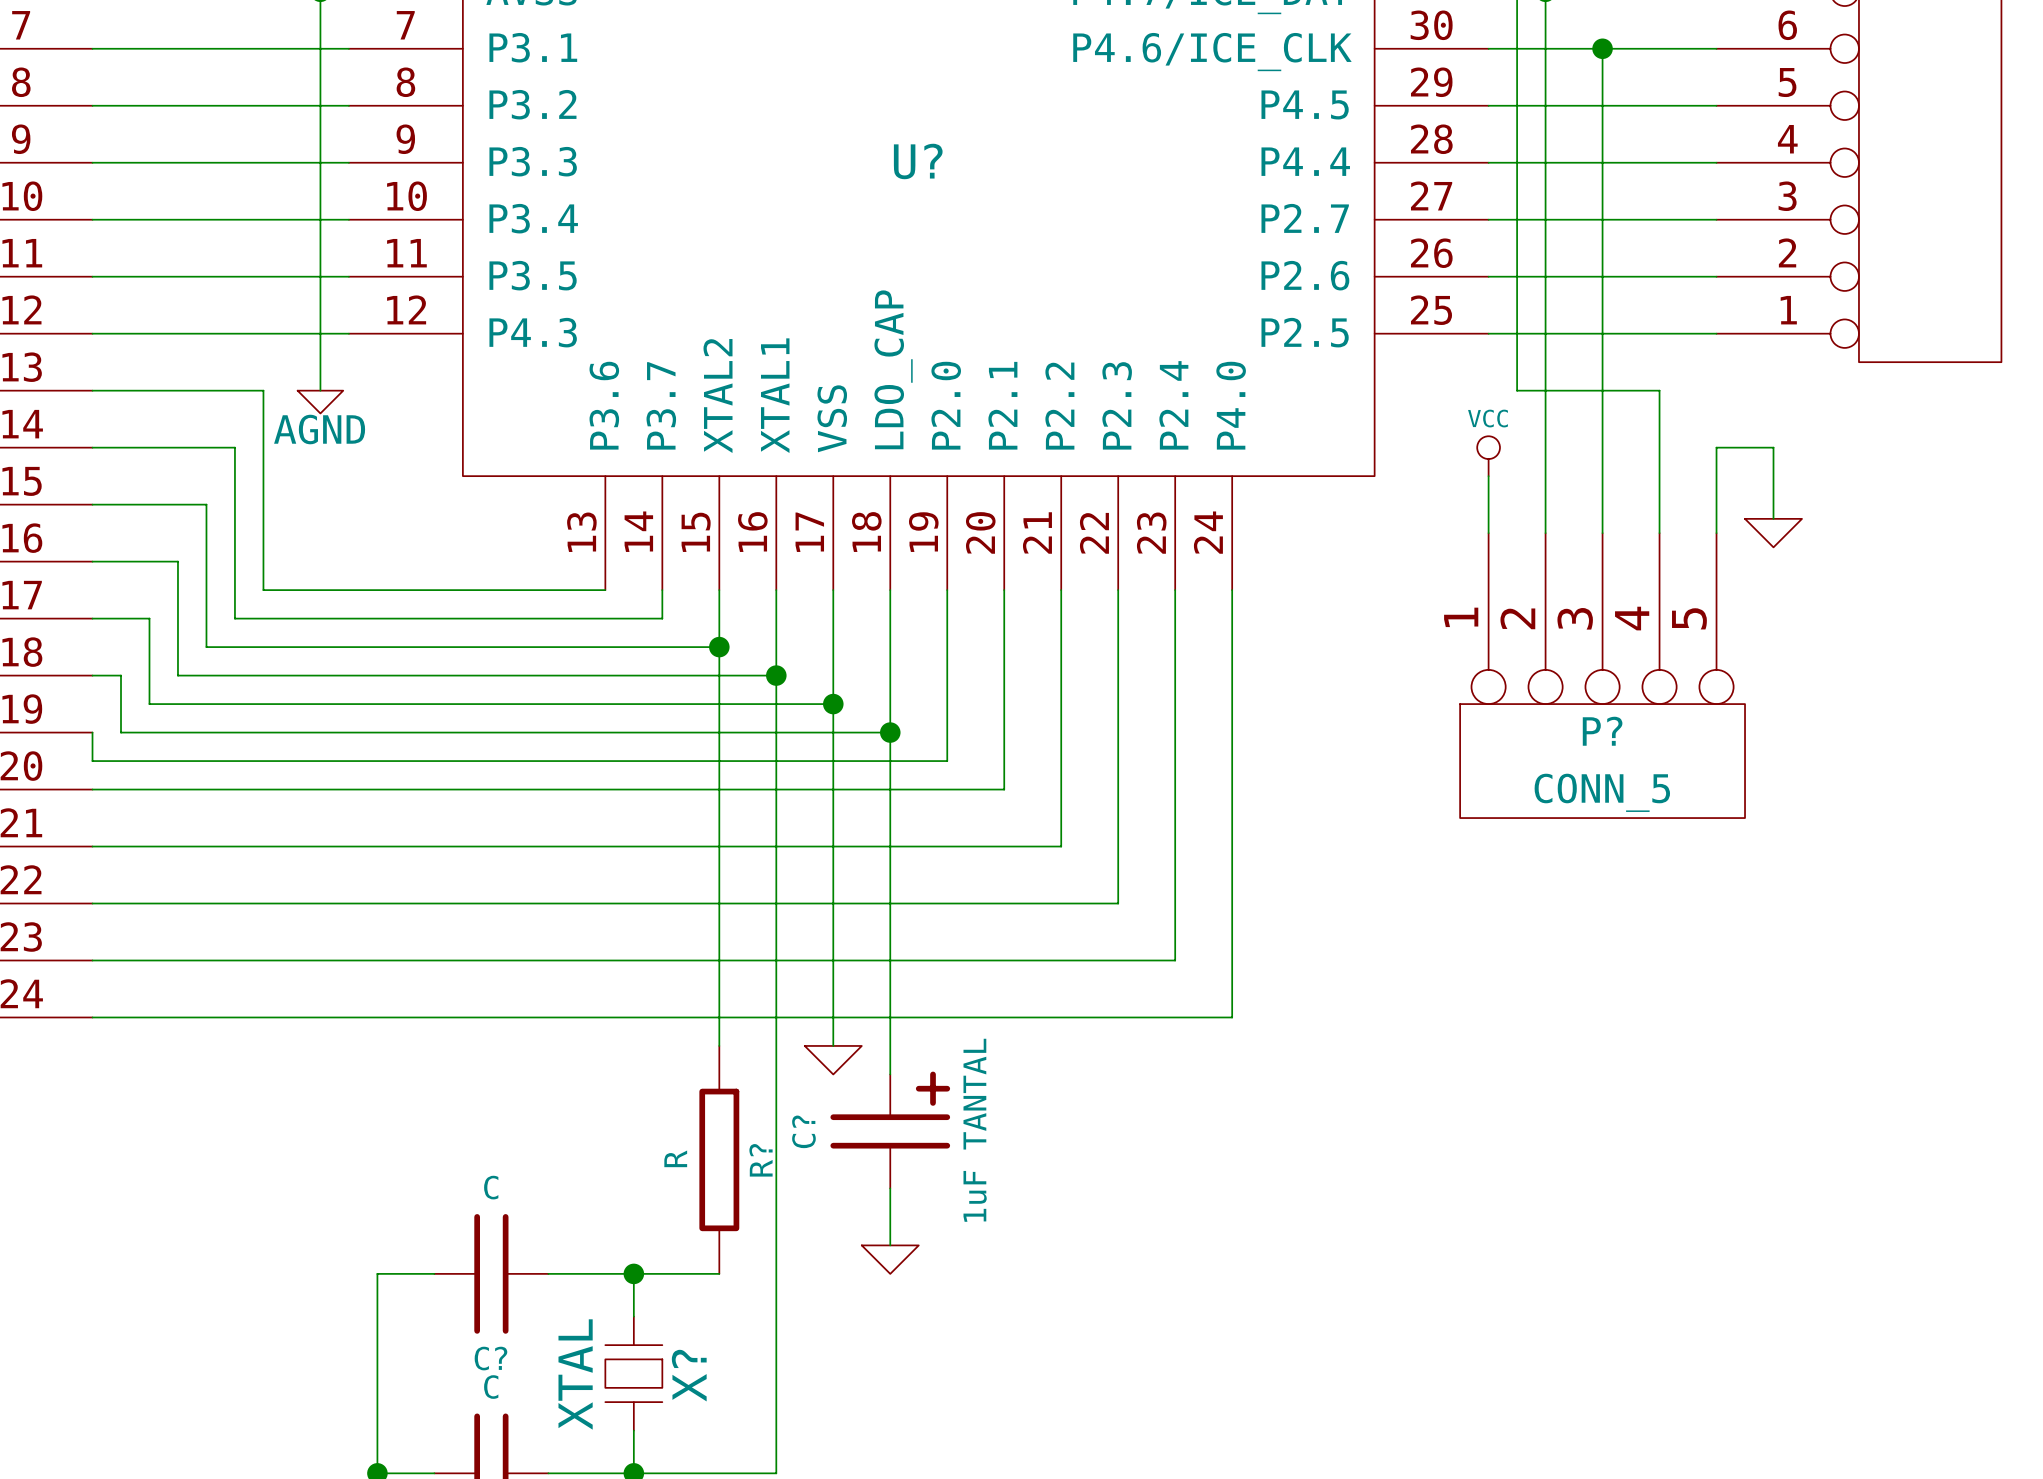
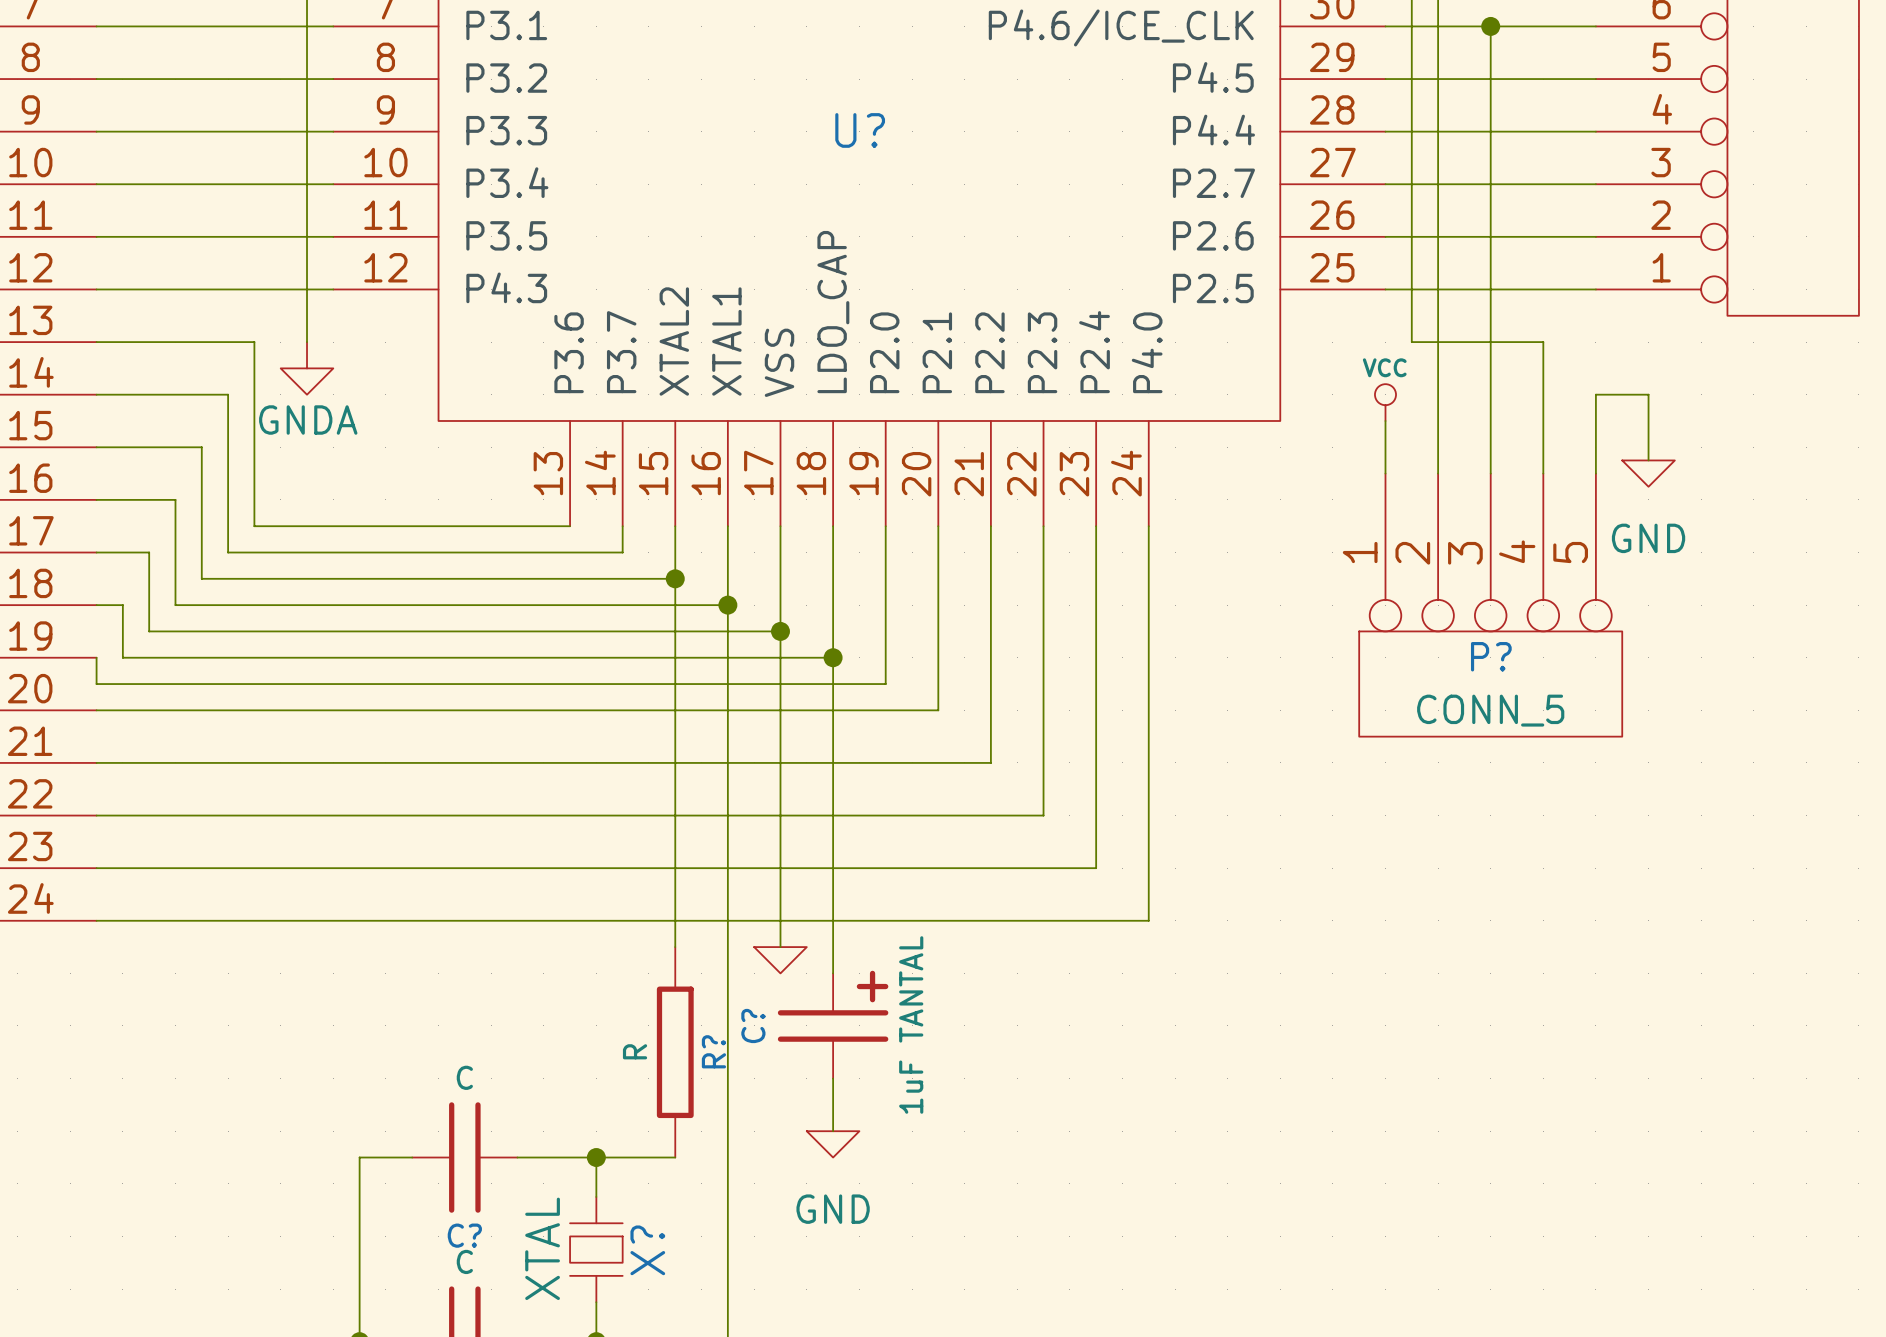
power symbol: AGND (320, 402) -> GNDA (307, 368)
power symbol text: none -> GND (1648, 538)
power symbol text: none -> GND (833, 1209)

